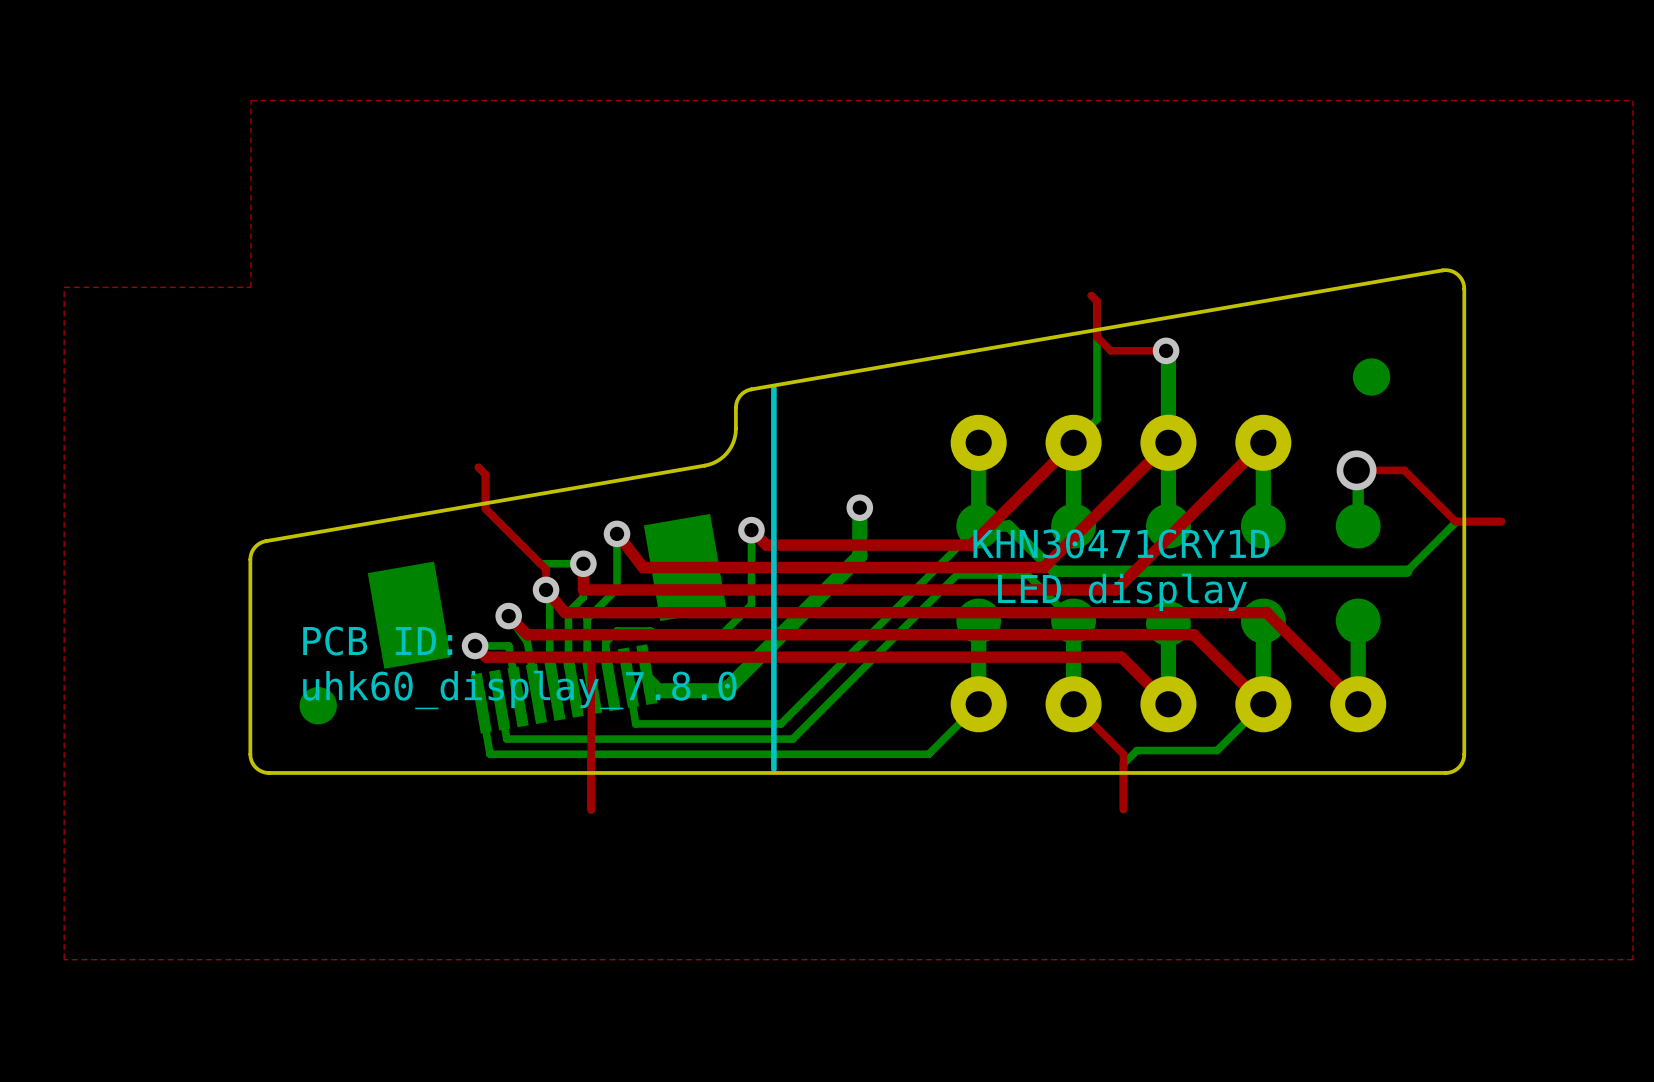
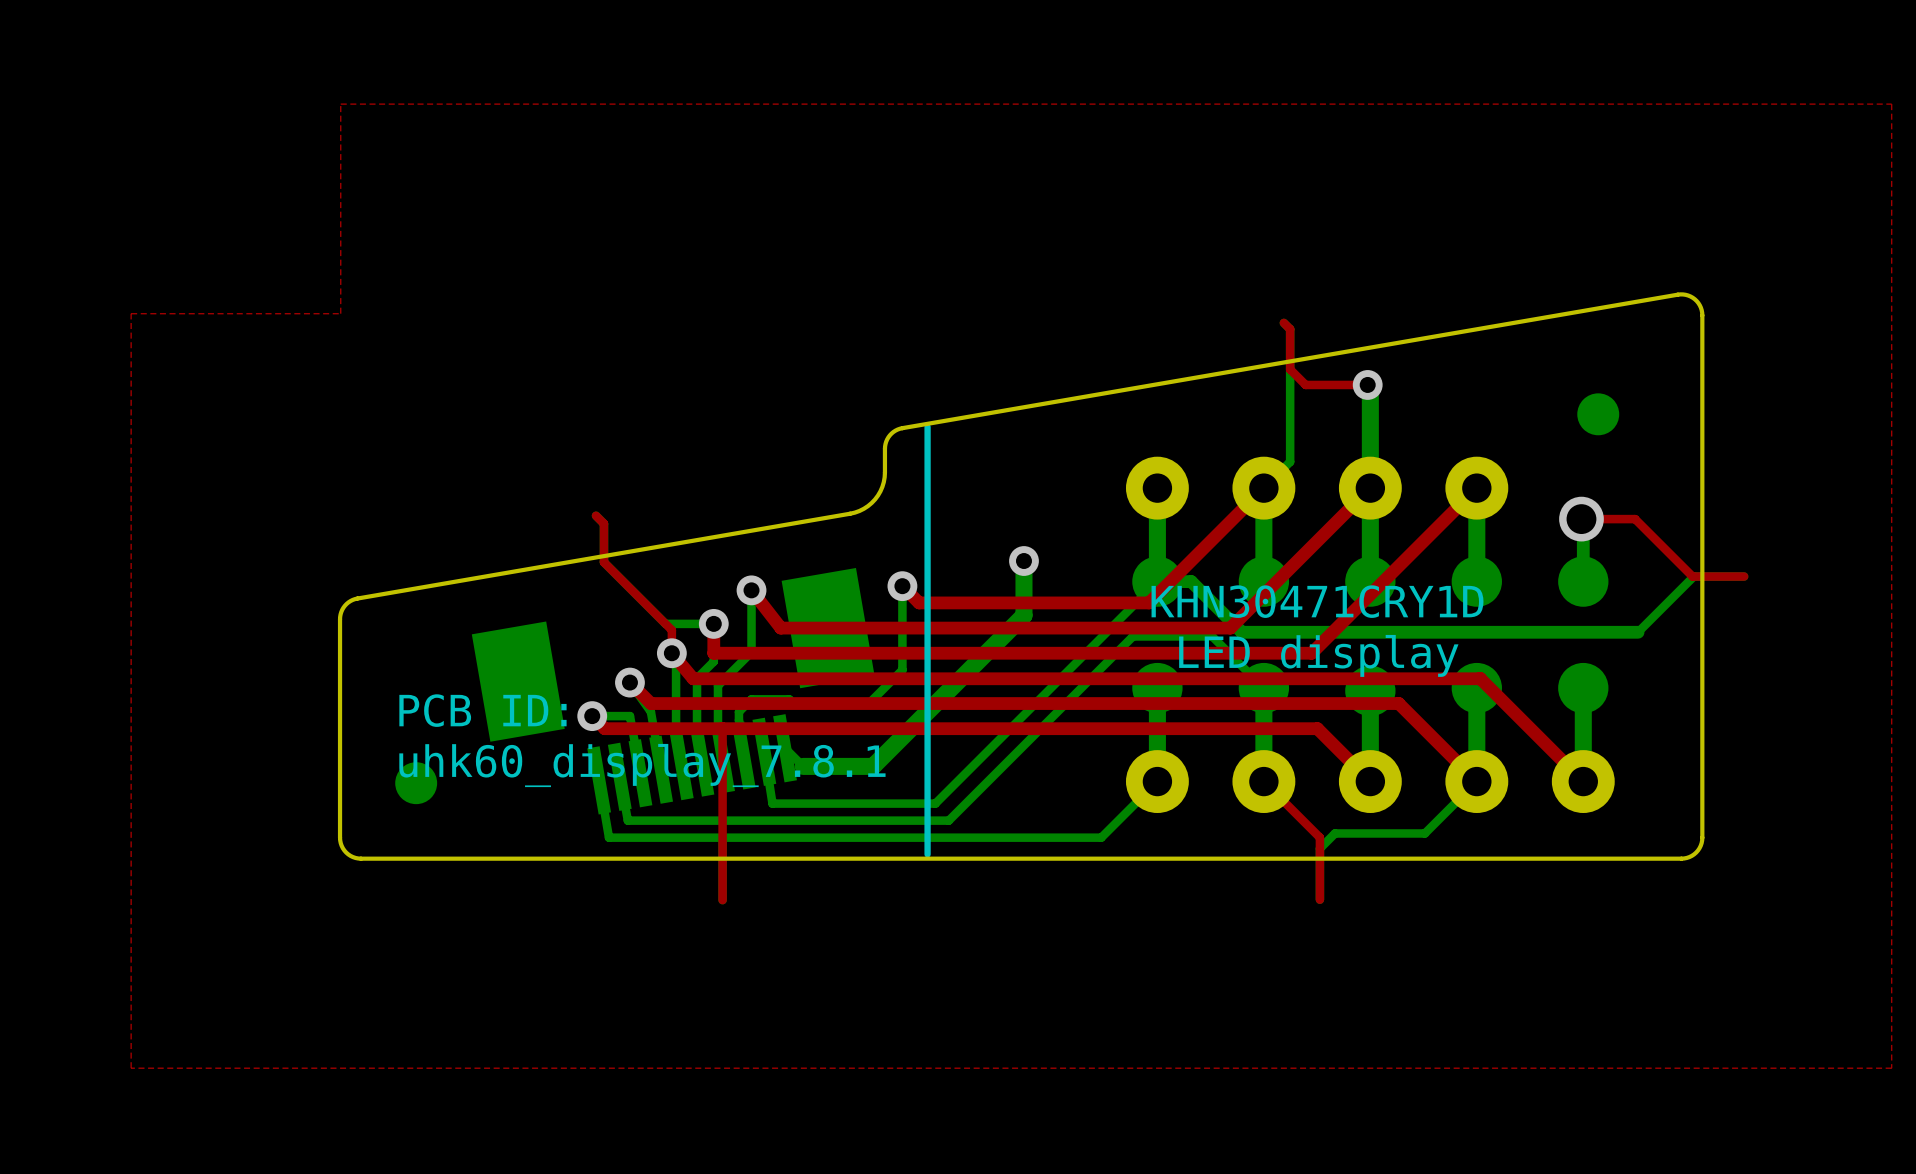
text: uhk60_display_7.8.0 (519, 689) -> uhk60_display_7.8.1 (642, 765)

